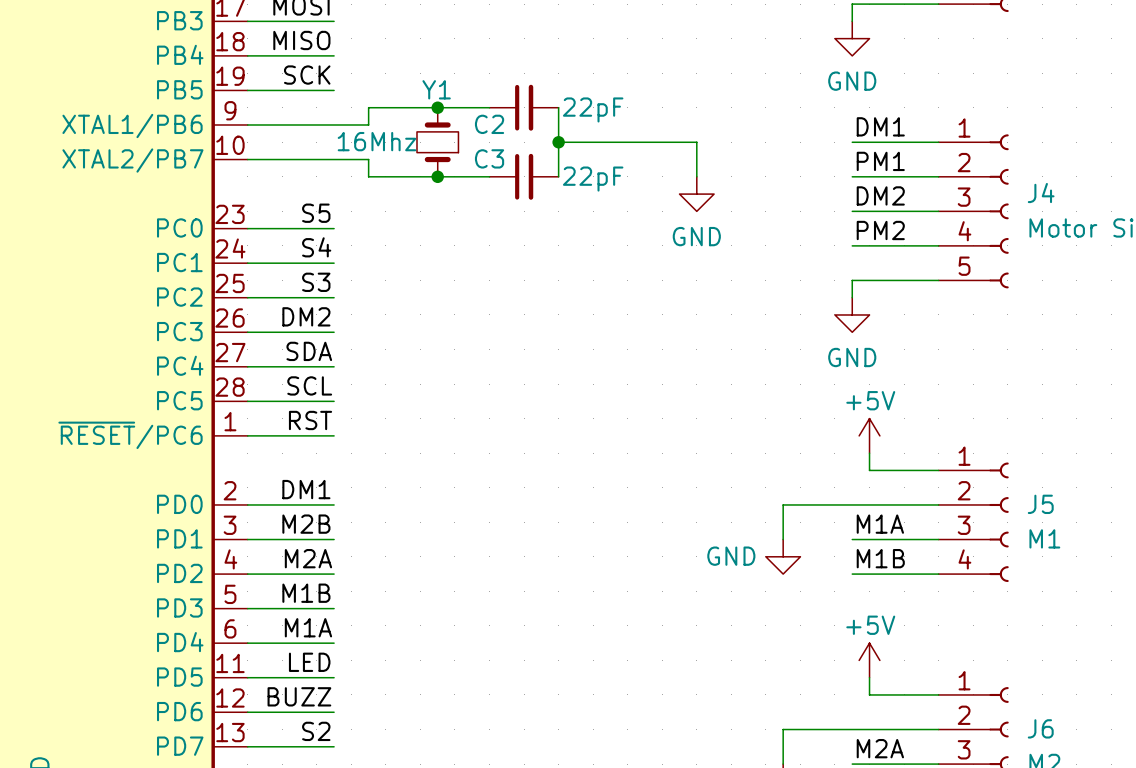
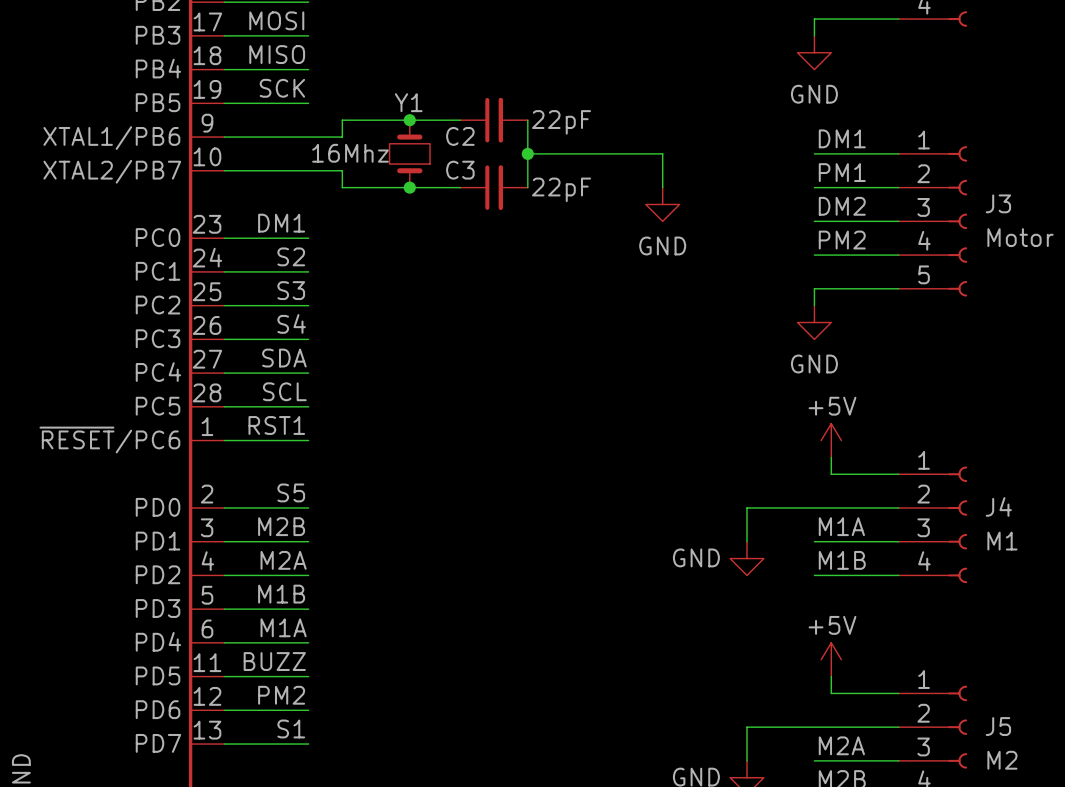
J4 name: J4 (1041, 193) -> J3 (998, 203)
label: S5 (316, 213) -> DM1 (281, 223)
label: S4 (316, 247) -> S2 (291, 256)
label: DM2 (306, 316) -> S4 (291, 323)
label: RST (310, 420) -> RST1 (276, 425)
label: DM1 (306, 489) -> S5 (291, 492)
J5 name: J5 (1040, 504) -> J4 (998, 506)
label: LED (309, 662) -> BUZZ (274, 661)
label: BUZZ (299, 696) -> PM2 (281, 695)
J6 name: J6 (1040, 728) -> J5 (998, 726)
label: S2 (316, 731) -> S1 (291, 728)

